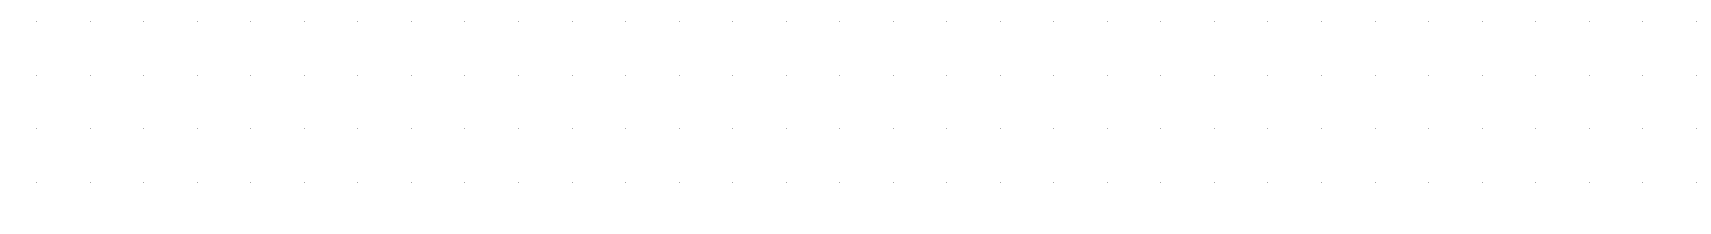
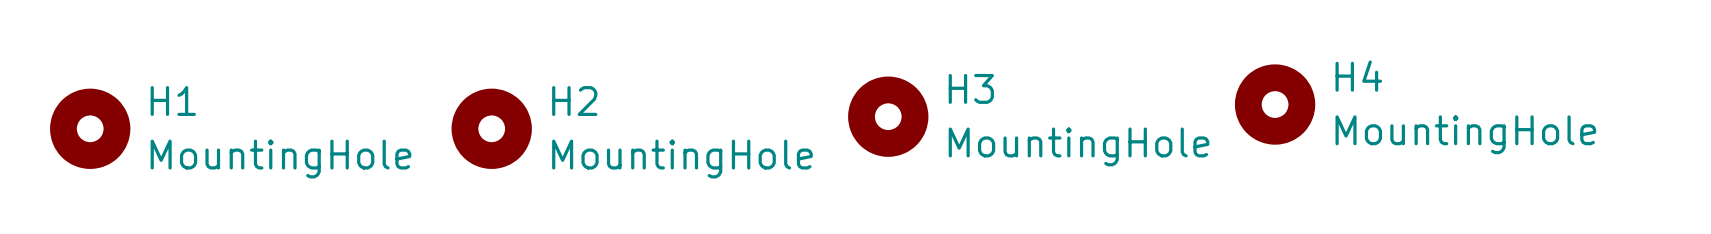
H4: none -> MountingHole (1275, 104)
H3: none -> MountingHole (888, 116)
H1: none -> MountingHole (90, 128)
H2: none -> MountingHole (491, 128)

